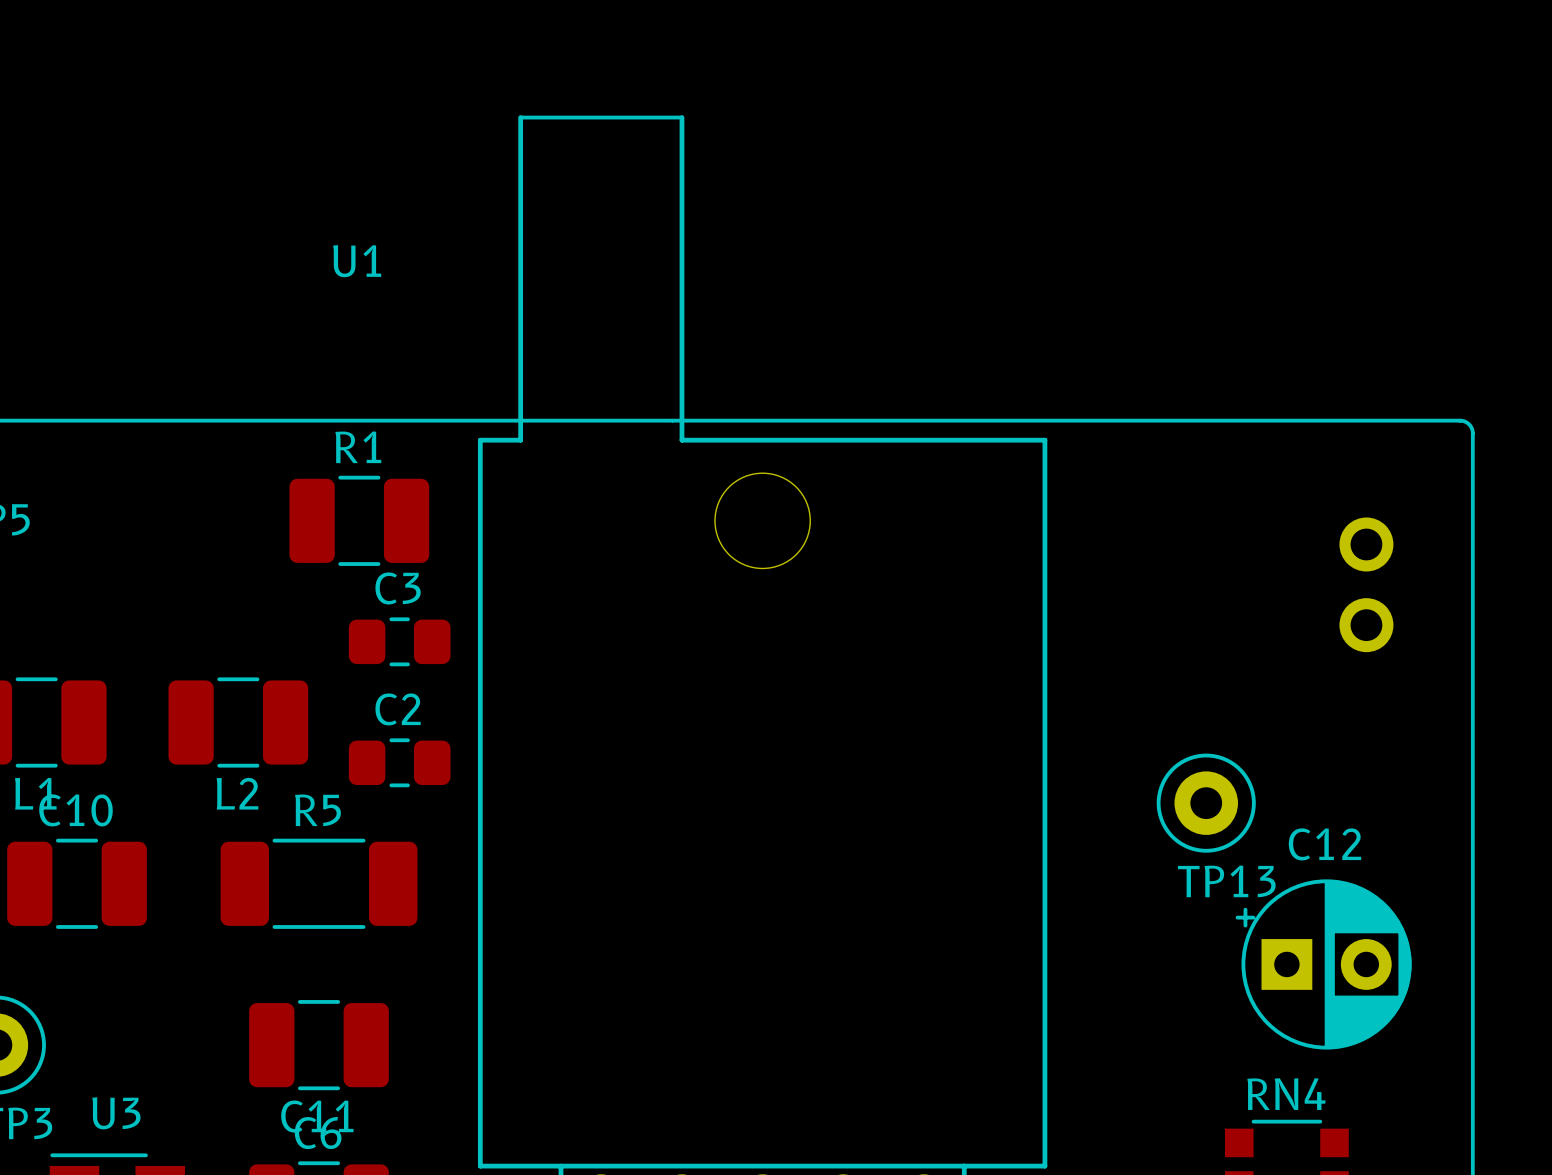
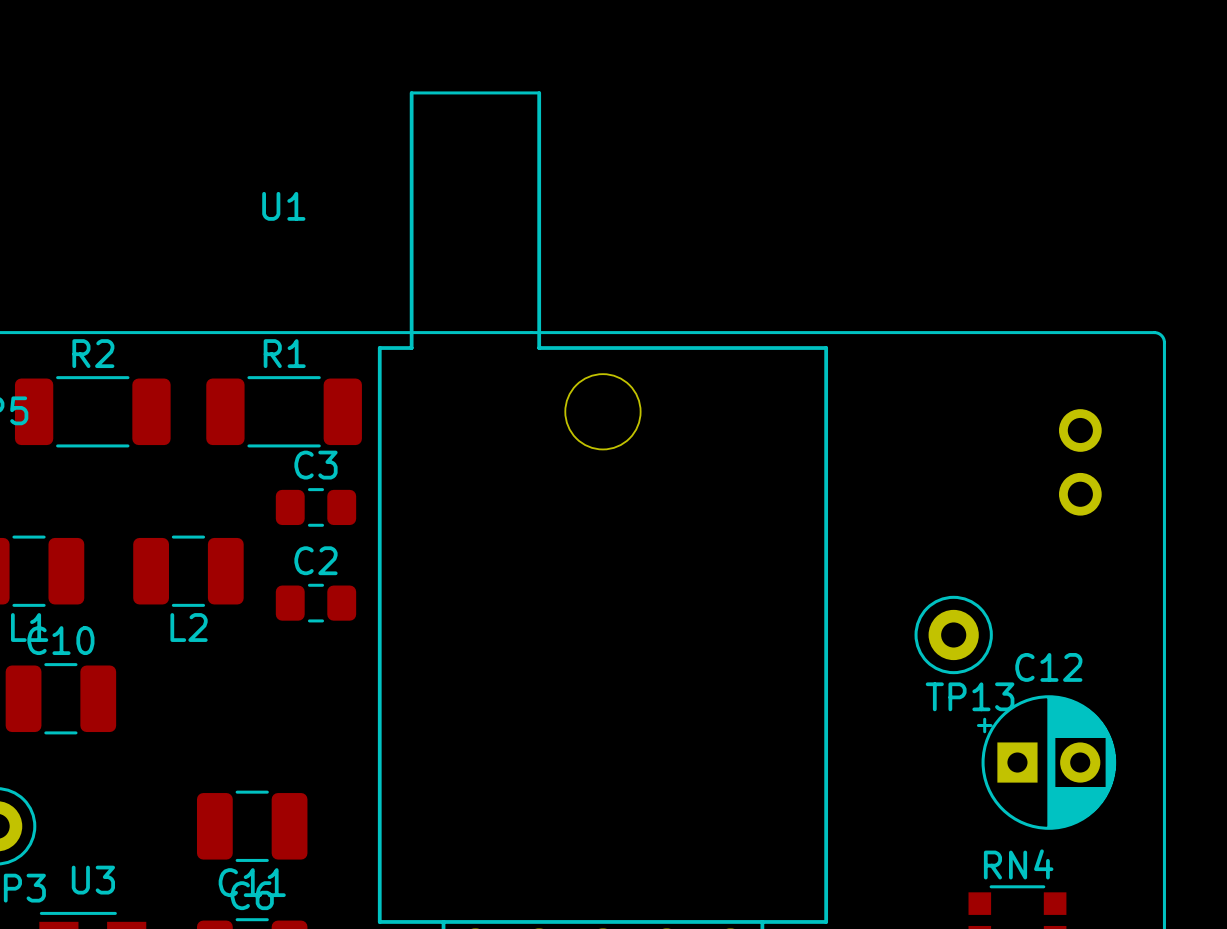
R1 footprint: [289, 475, 430, 566] -> [206, 376, 362, 448]
R2: none -> (92, 411)
R5: (319, 883) -> none

